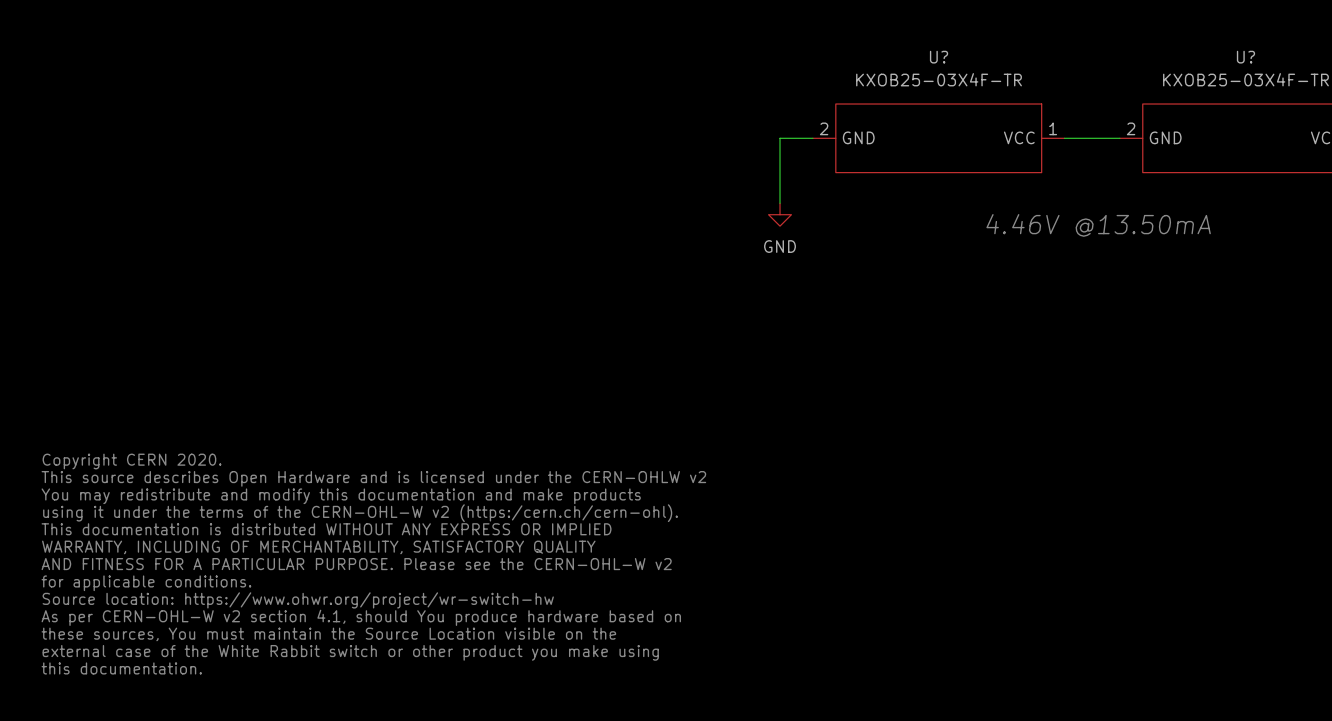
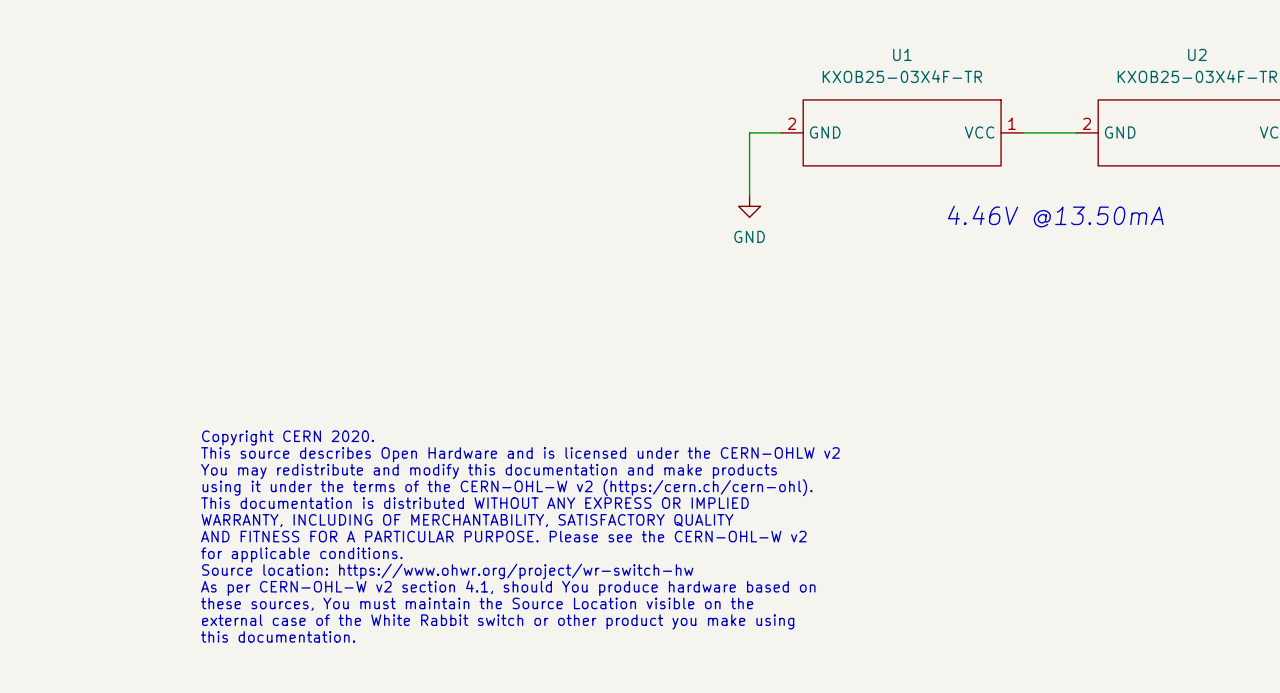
U? name: U? (939, 57) -> U1 (902, 54)
U? name: U? (1245, 57) -> U2 (1197, 54)
text position: Copyright CERN 2020. (132, 461) -> Copyright CERN 2020. (287, 437)
text position: This source describes Open Hardware and is licensed under the CERN-OHLW v2 (373, 478) -> This source describes Open Hardware and is licensed under the CERN-OHLW v2 (520, 454)
text position: You may redistribute and modify this documentation and make products (341, 496) -> You may redistribute and modify this documentation and make products (489, 471)
text position: using it under the terms of the CERN-OHL-W v2 (https:/cern.ch/cern-ohl). (360, 513) -> using it under the terms of the CERN-OHL-W v2 (https:/cern.ch/cern-ohl). (507, 487)
text position: This documentation is distributed WITHOUT ANY EXPRESS OR IMPLIED (326, 529) -> This documentation is distributed WITHOUT ANY EXPRESS OR IMPLIED (474, 503)
text position: WARRANTY, INCLUDING OF MERCHANTABILITY, SATISFACTORY QUALITY (318, 547) -> WARRANTY, INCLUDING OF MERCHANTABILITY, SATISFACTORY QUALITY (467, 520)
text position: AND FITNESS FOR A PARTICULAR PURPOSE. Please see the CERN-OHL-W v2 (356, 564) -> AND FITNESS FOR A PARTICULAR PURPOSE. Please see the CERN-OHL-W v2 (503, 536)
text position: for applicable conditions. (146, 583) -> for applicable conditions. (301, 555)
text position: Source location: https://www.ohwr.org/project/wr-switch-hw (298, 600) -> Source location: https://www.ohwr.org/project/wr-switch-hw (447, 571)
text position: As per CERN-OHL-W v2 section 4.1, should You produce hardware based on (361, 617) -> As per CERN-OHL-W v2 section 4.1, should You produce hardware based on (508, 588)
text position: these sources, You must maintain the Source Location visible on the (328, 634) -> these sources, You must maintain the Source Location visible on the (477, 604)
text position: external case of the White Rabbit switch or other product you make using (350, 652) -> external case of the White Rabbit switch or other product you make using (498, 621)
text position: this documentation. (121, 668) -> this documentation. (278, 636)

